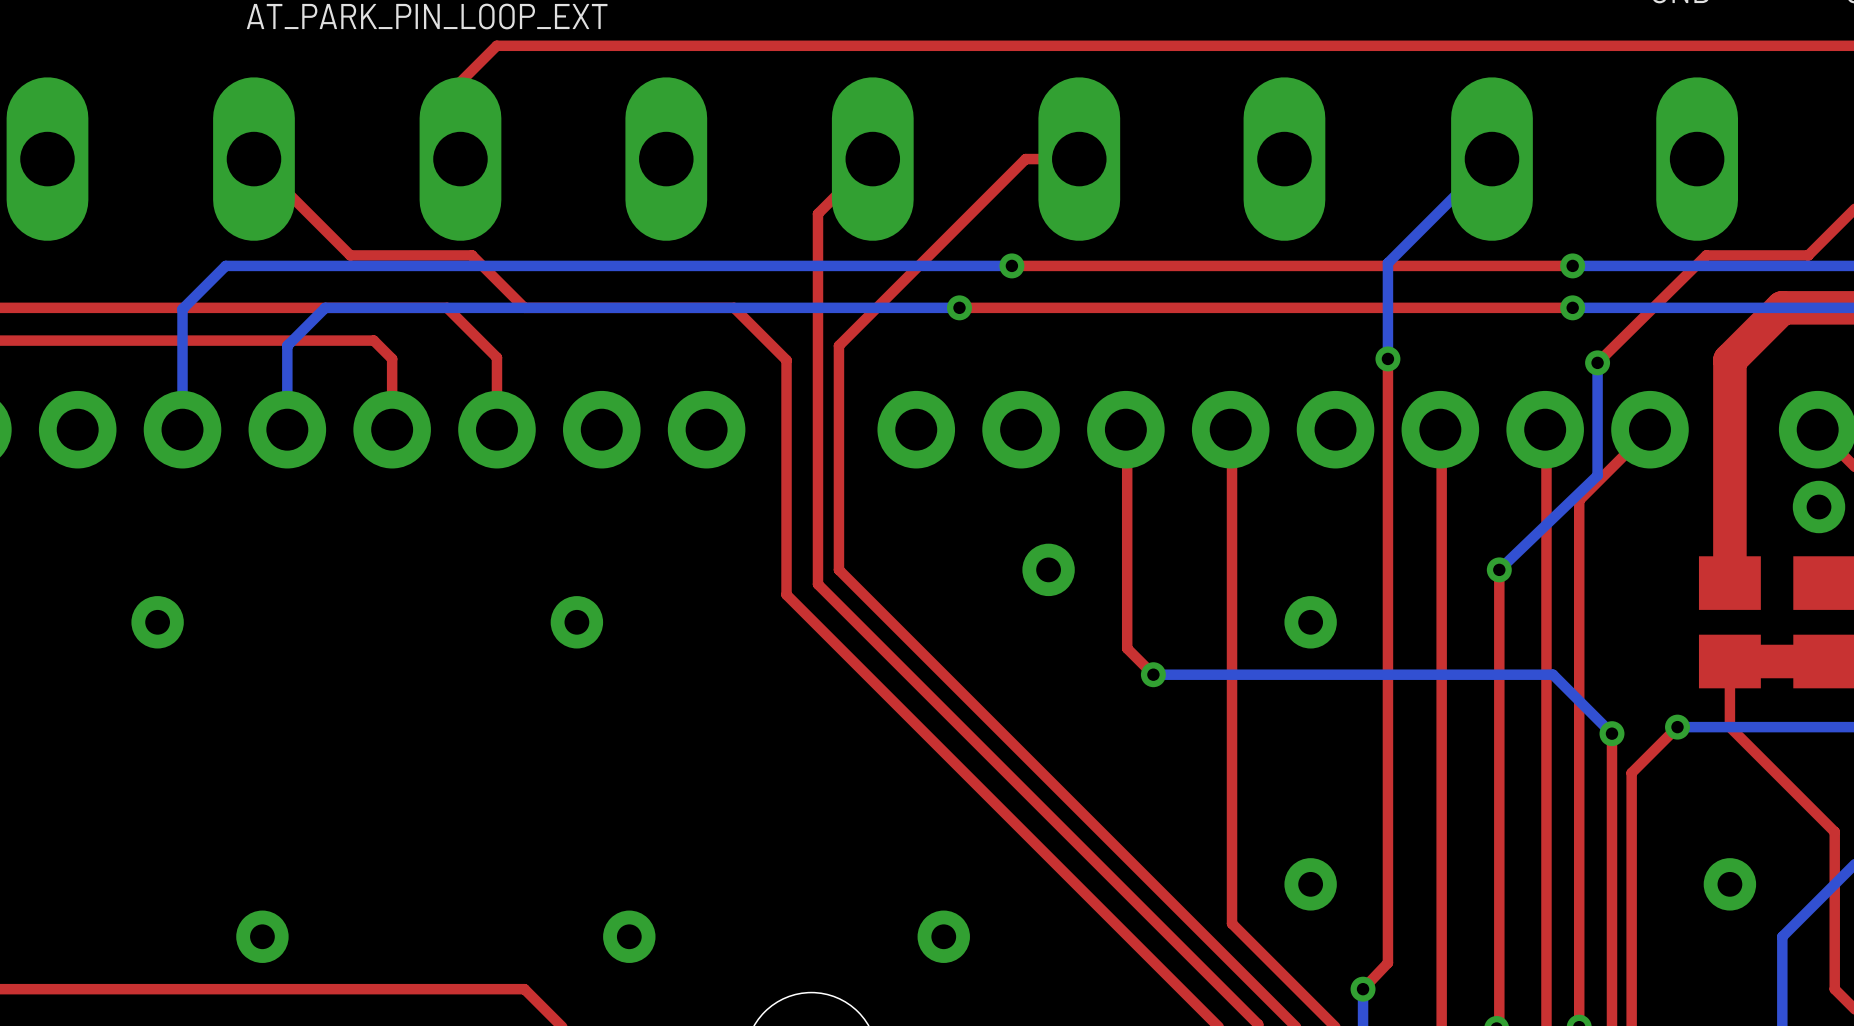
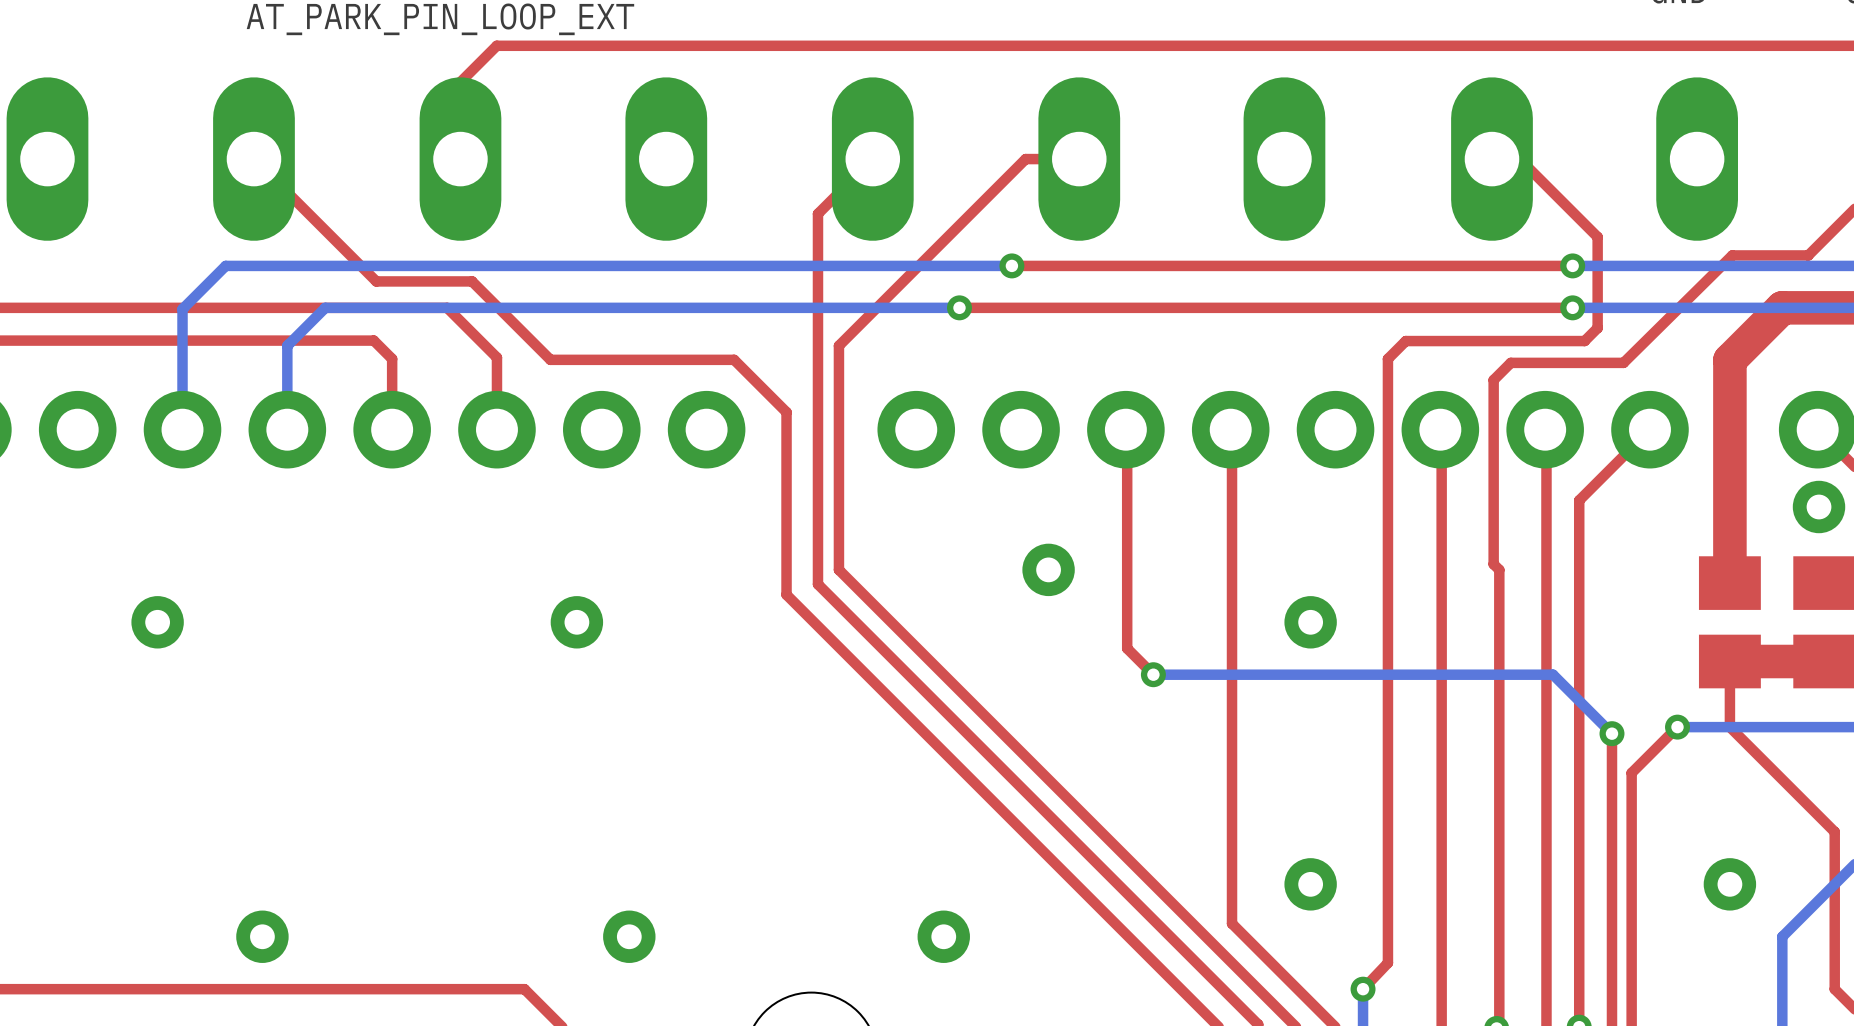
top track: none -> (1491, 159) (1519, 159) (1597, 237) (1597, 328) (1584, 341) (1405, 341) (1387, 358)
bottom track: (1491, 159) (1387, 263) (1387, 358) -> none
top track: (350, 255) (472, 255) (524, 307) (734, 307) (786, 360) (786, 412) -> (350, 255) (376, 281) (472, 281) (550, 359) (734, 359) (786, 412)
top track: (1732, 255) (1706, 255) (1597, 362) -> (1732, 255) (1623, 362) (1510, 362) (1493, 380) (1493, 564) (1499, 569)
via: (1387, 358) -> none
bottom track: (1597, 362) (1597, 475) (1499, 569) -> none
via: (1597, 362) -> none
via: (1499, 569) -> none

